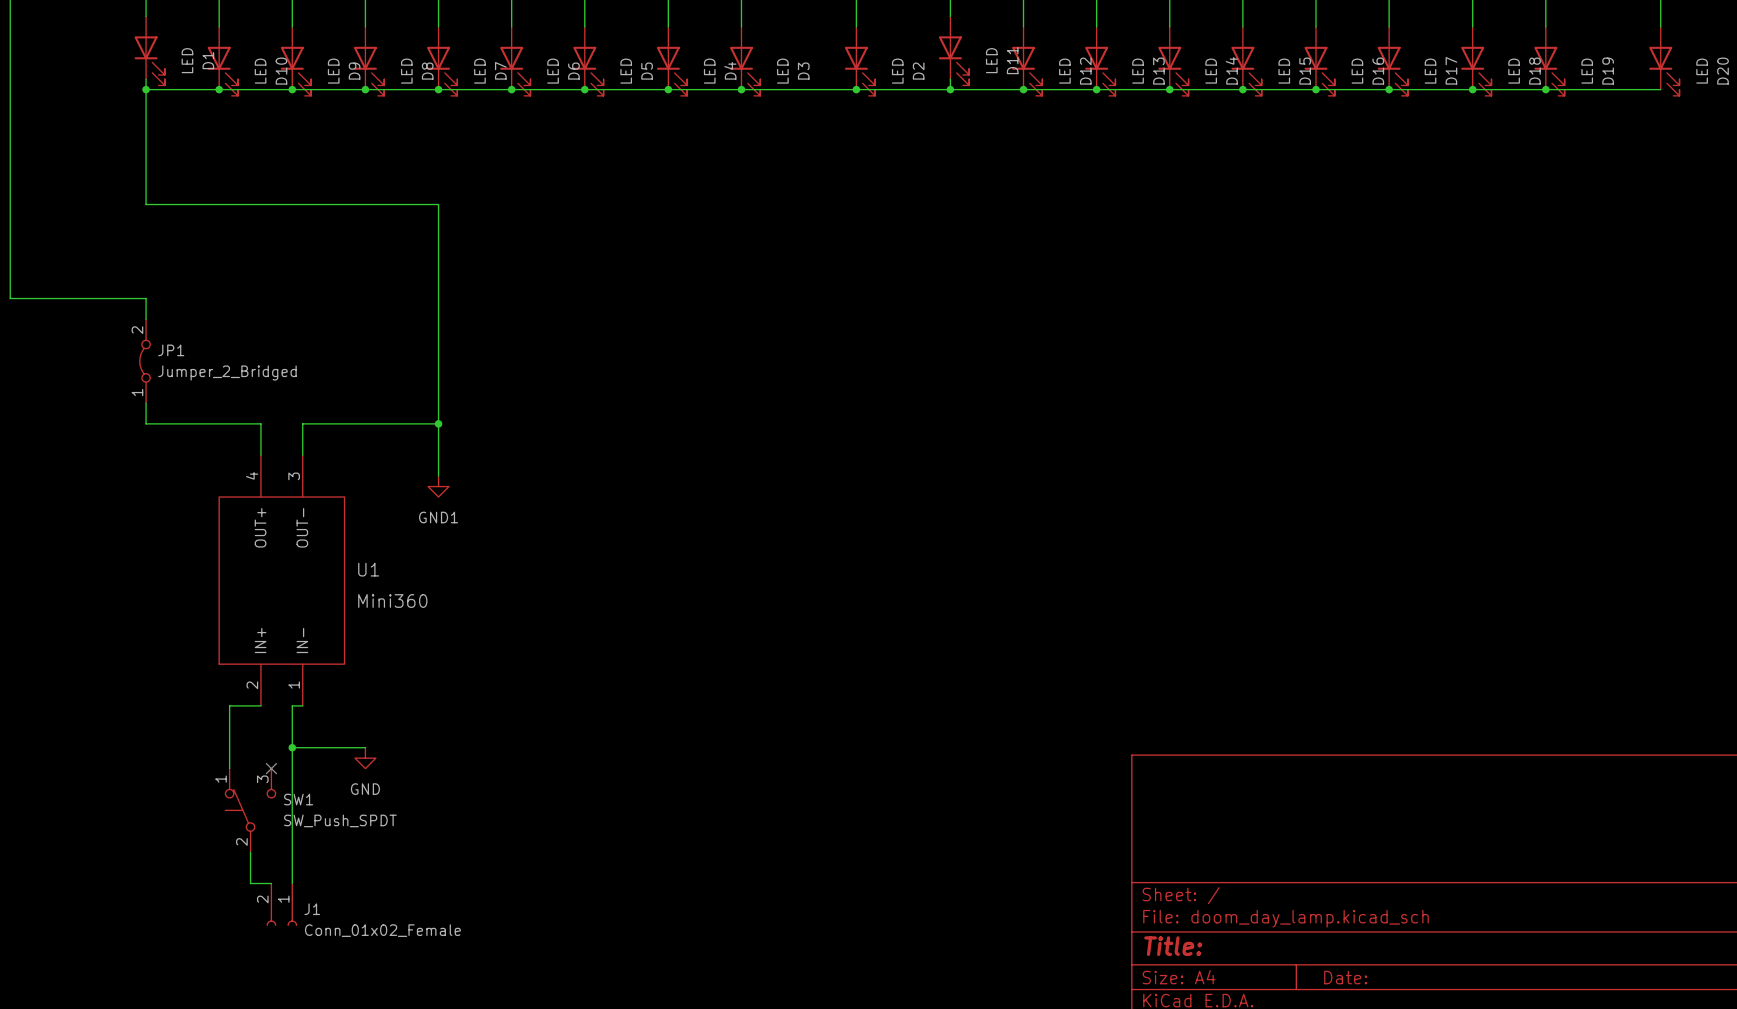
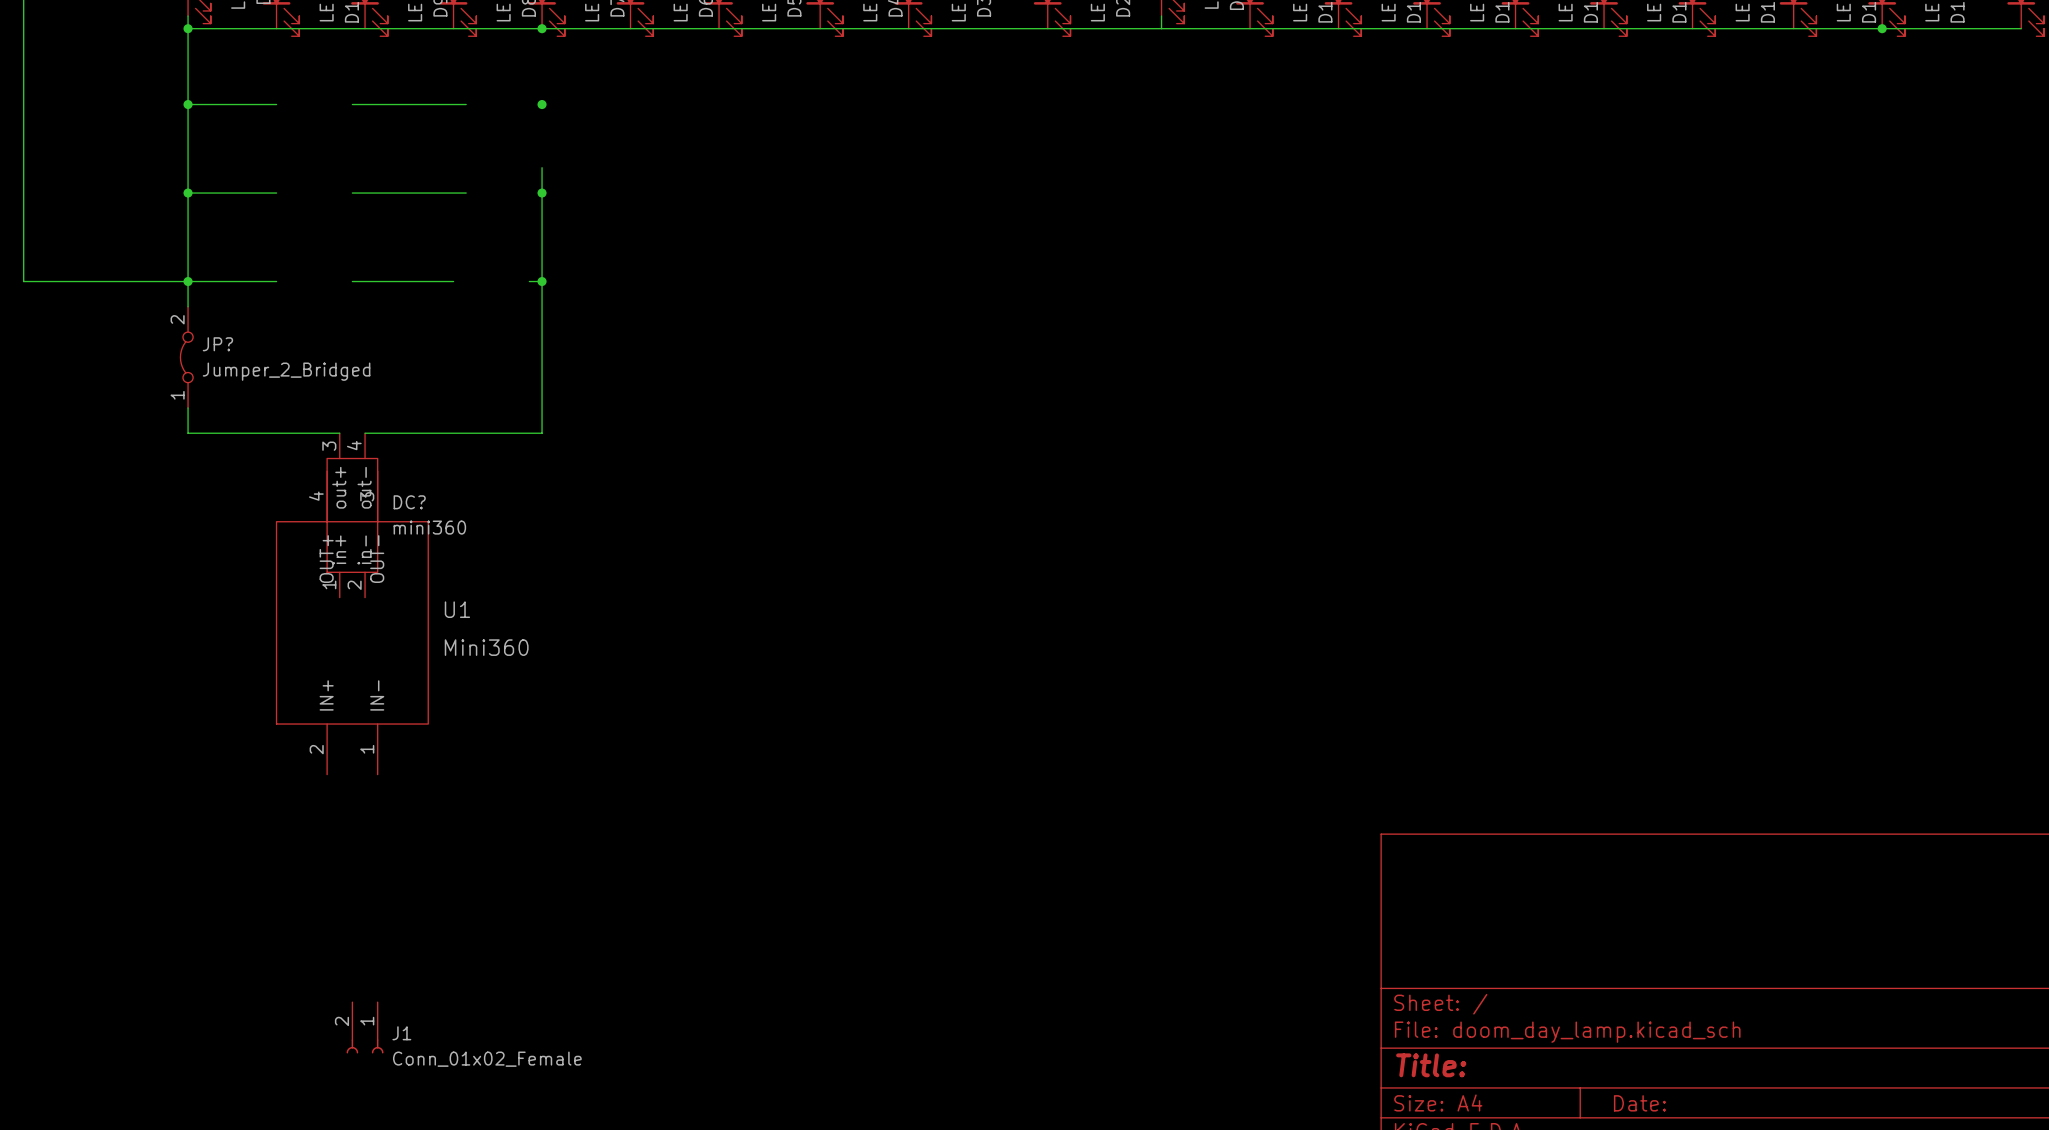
junction: (219, 89) -> none
junction: (292, 89) -> none
junction: (365, 89) -> none
junction: (511, 89) -> none
junction: (584, 89) -> none
junction: (668, 89) -> none
junction: (741, 89) -> none
junction: (856, 89) -> none
junction: (950, 89) -> none
junction: (1023, 89) -> none
junction: (1096, 89) -> none
junction: (1169, 89) -> none
junction: (1242, 89) -> none
junction: (1316, 89) -> none
junction: (1389, 89) -> none
junction: (1472, 89) -> none
wire: none -> (188, 104) (276, 104)
junction: none -> (188, 104)
wire: none -> (352, 104) (466, 104)
junction: none -> (542, 104)
wire: (146, 204) (438, 204) -> (188, 167) (188, 281) (276, 281)
wire: none -> (188, 193) (276, 193)
junction: none -> (188, 193)
wire: none -> (352, 193) (466, 193)
junction: none -> (542, 193)
junction: none -> (188, 281)
wire: none -> (352, 281) (453, 281)
wire: none -> (529, 281) (542, 281)
junction: none -> (542, 281)
JP1 name: JP1 (171, 350) -> JP? (217, 344)
wire: (260, 423) (260, 455) -> (327, 433) (339, 433)
wire: (302, 423) (302, 455) -> (377, 433) (365, 433)
wire: (438, 423) (438, 476) -> none
junction: (438, 423) -> none
power symbol: GND1 (438, 486) -> none
DC?: none -> mini360 (352, 515)
wire: (260, 705) (229, 705) (229, 768) -> none
wire: (302, 705) (292, 705) (292, 883) -> none
wire: (292, 747) (365, 747) -> none
junction: (292, 747) -> none
power symbol: GND (365, 758) -> none
no-connect mark: (271, 768) -> none
SW1: SW_Push_SPDT (250, 810) -> none
wire: (250, 852) (250, 883) (271, 883) -> none
J1 position: (281, 904) -> (365, 1027)

